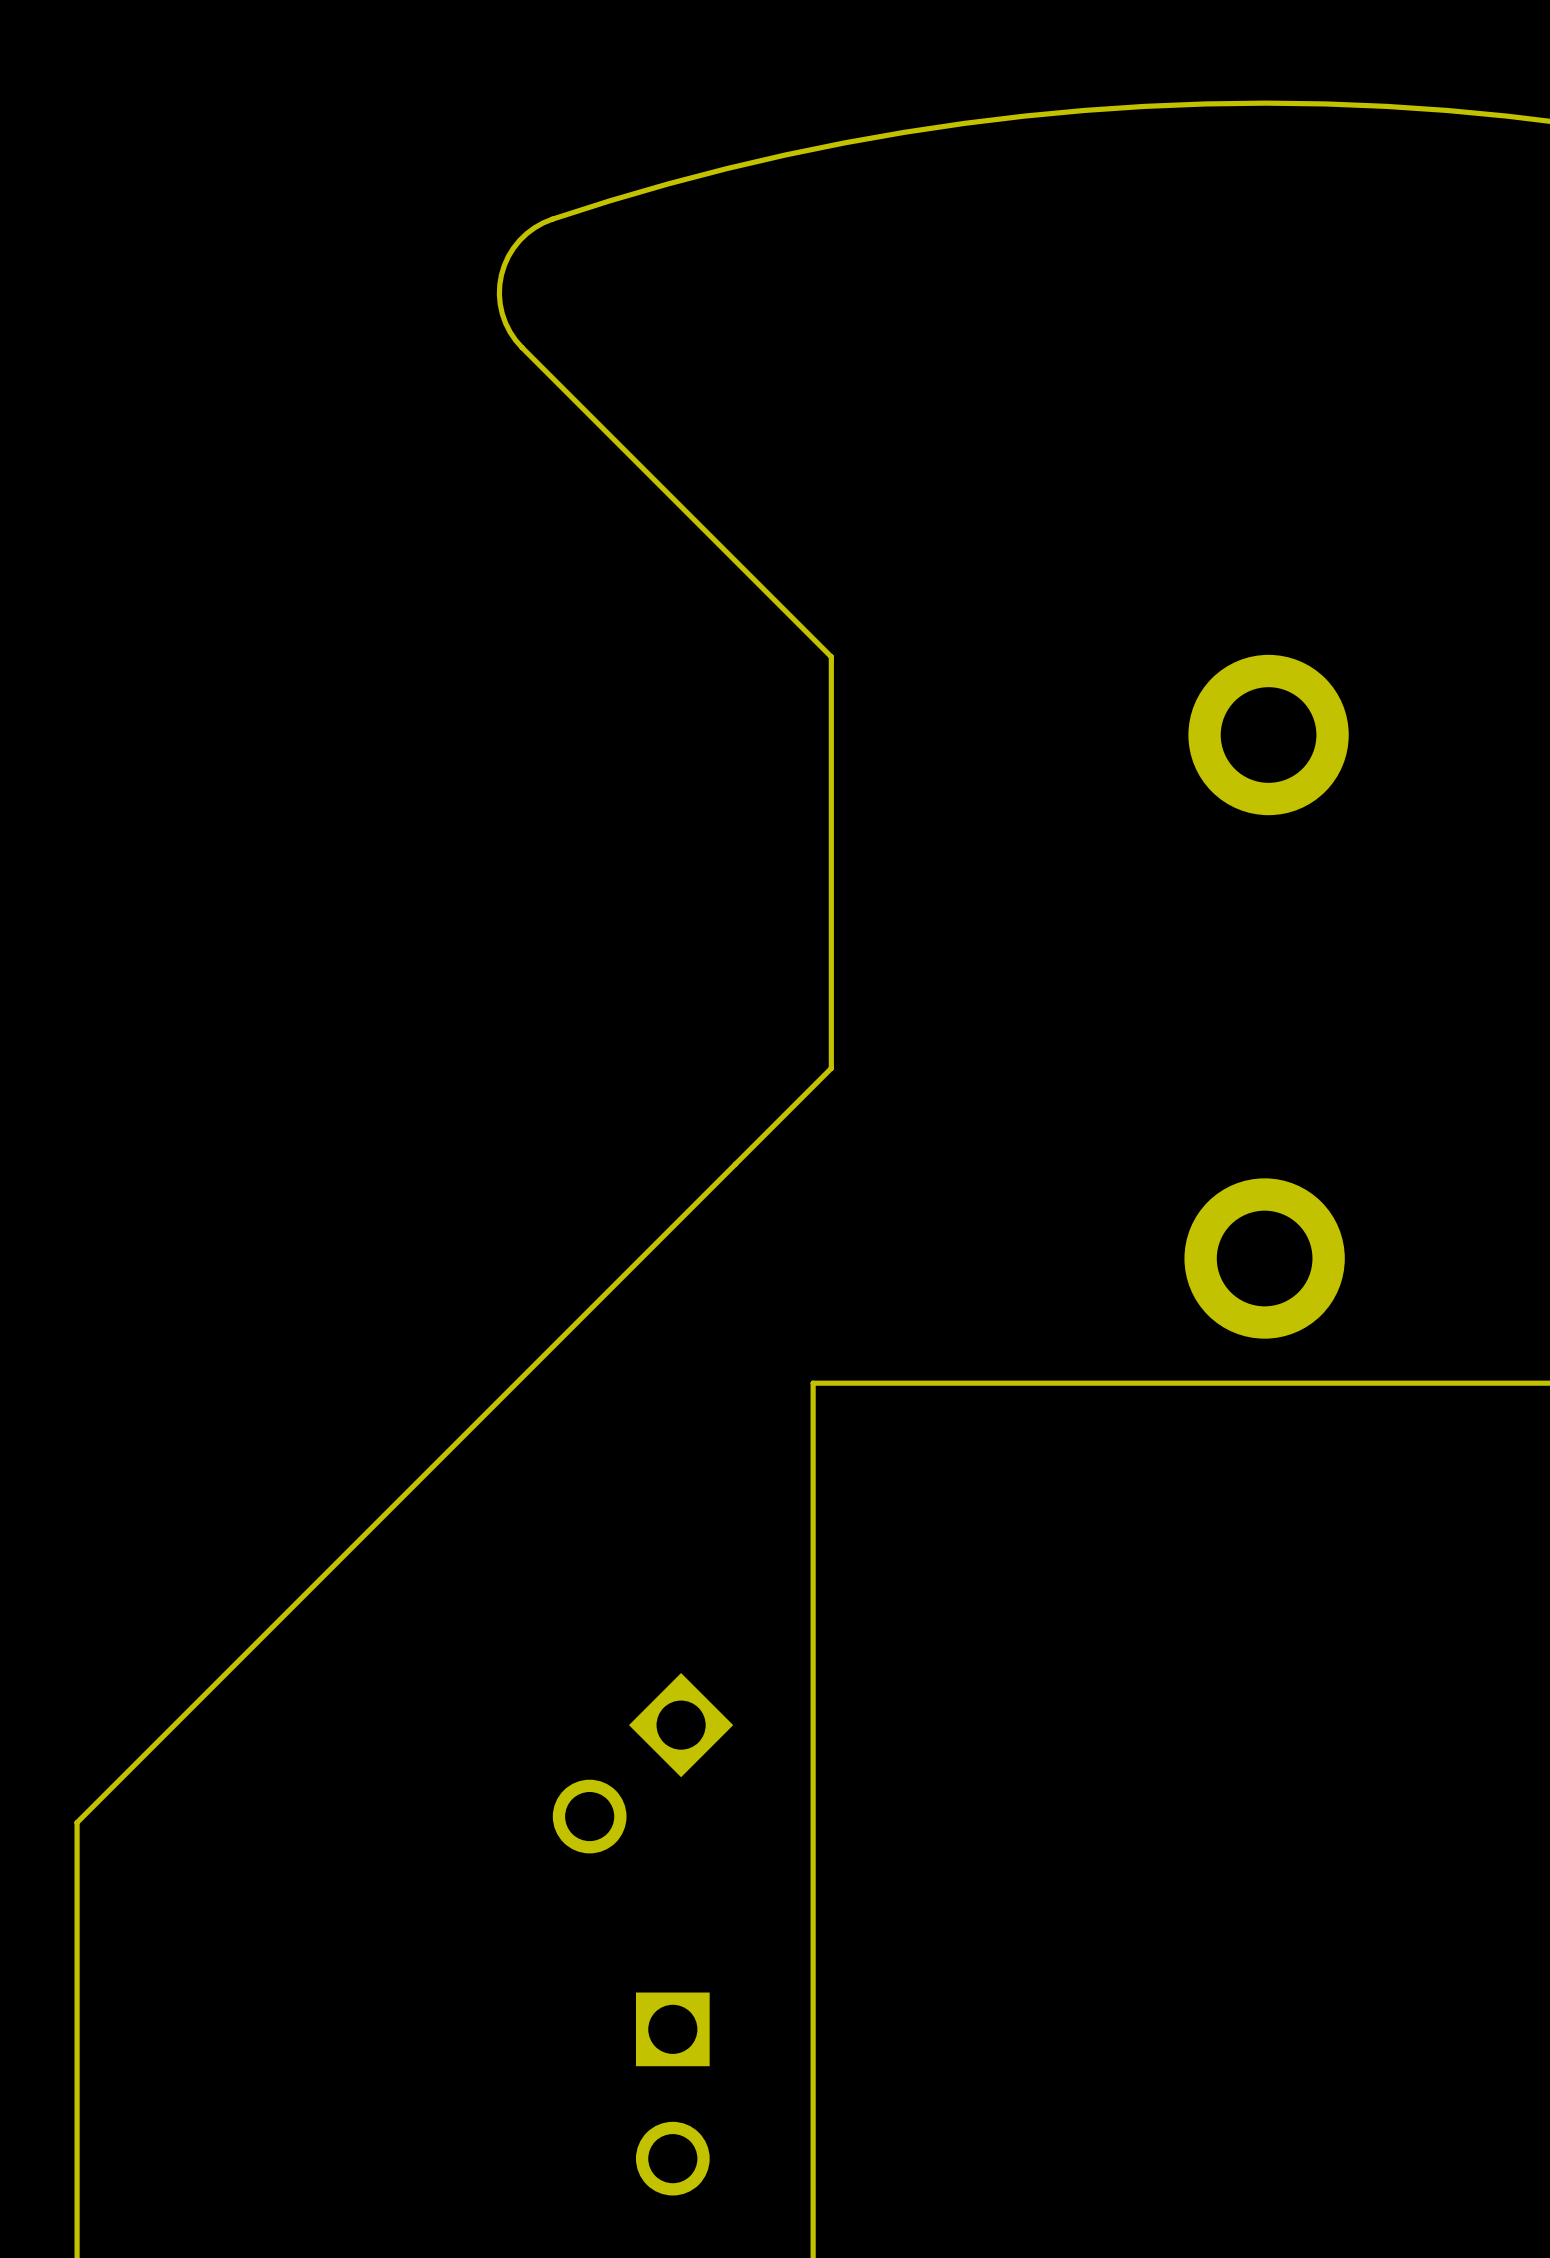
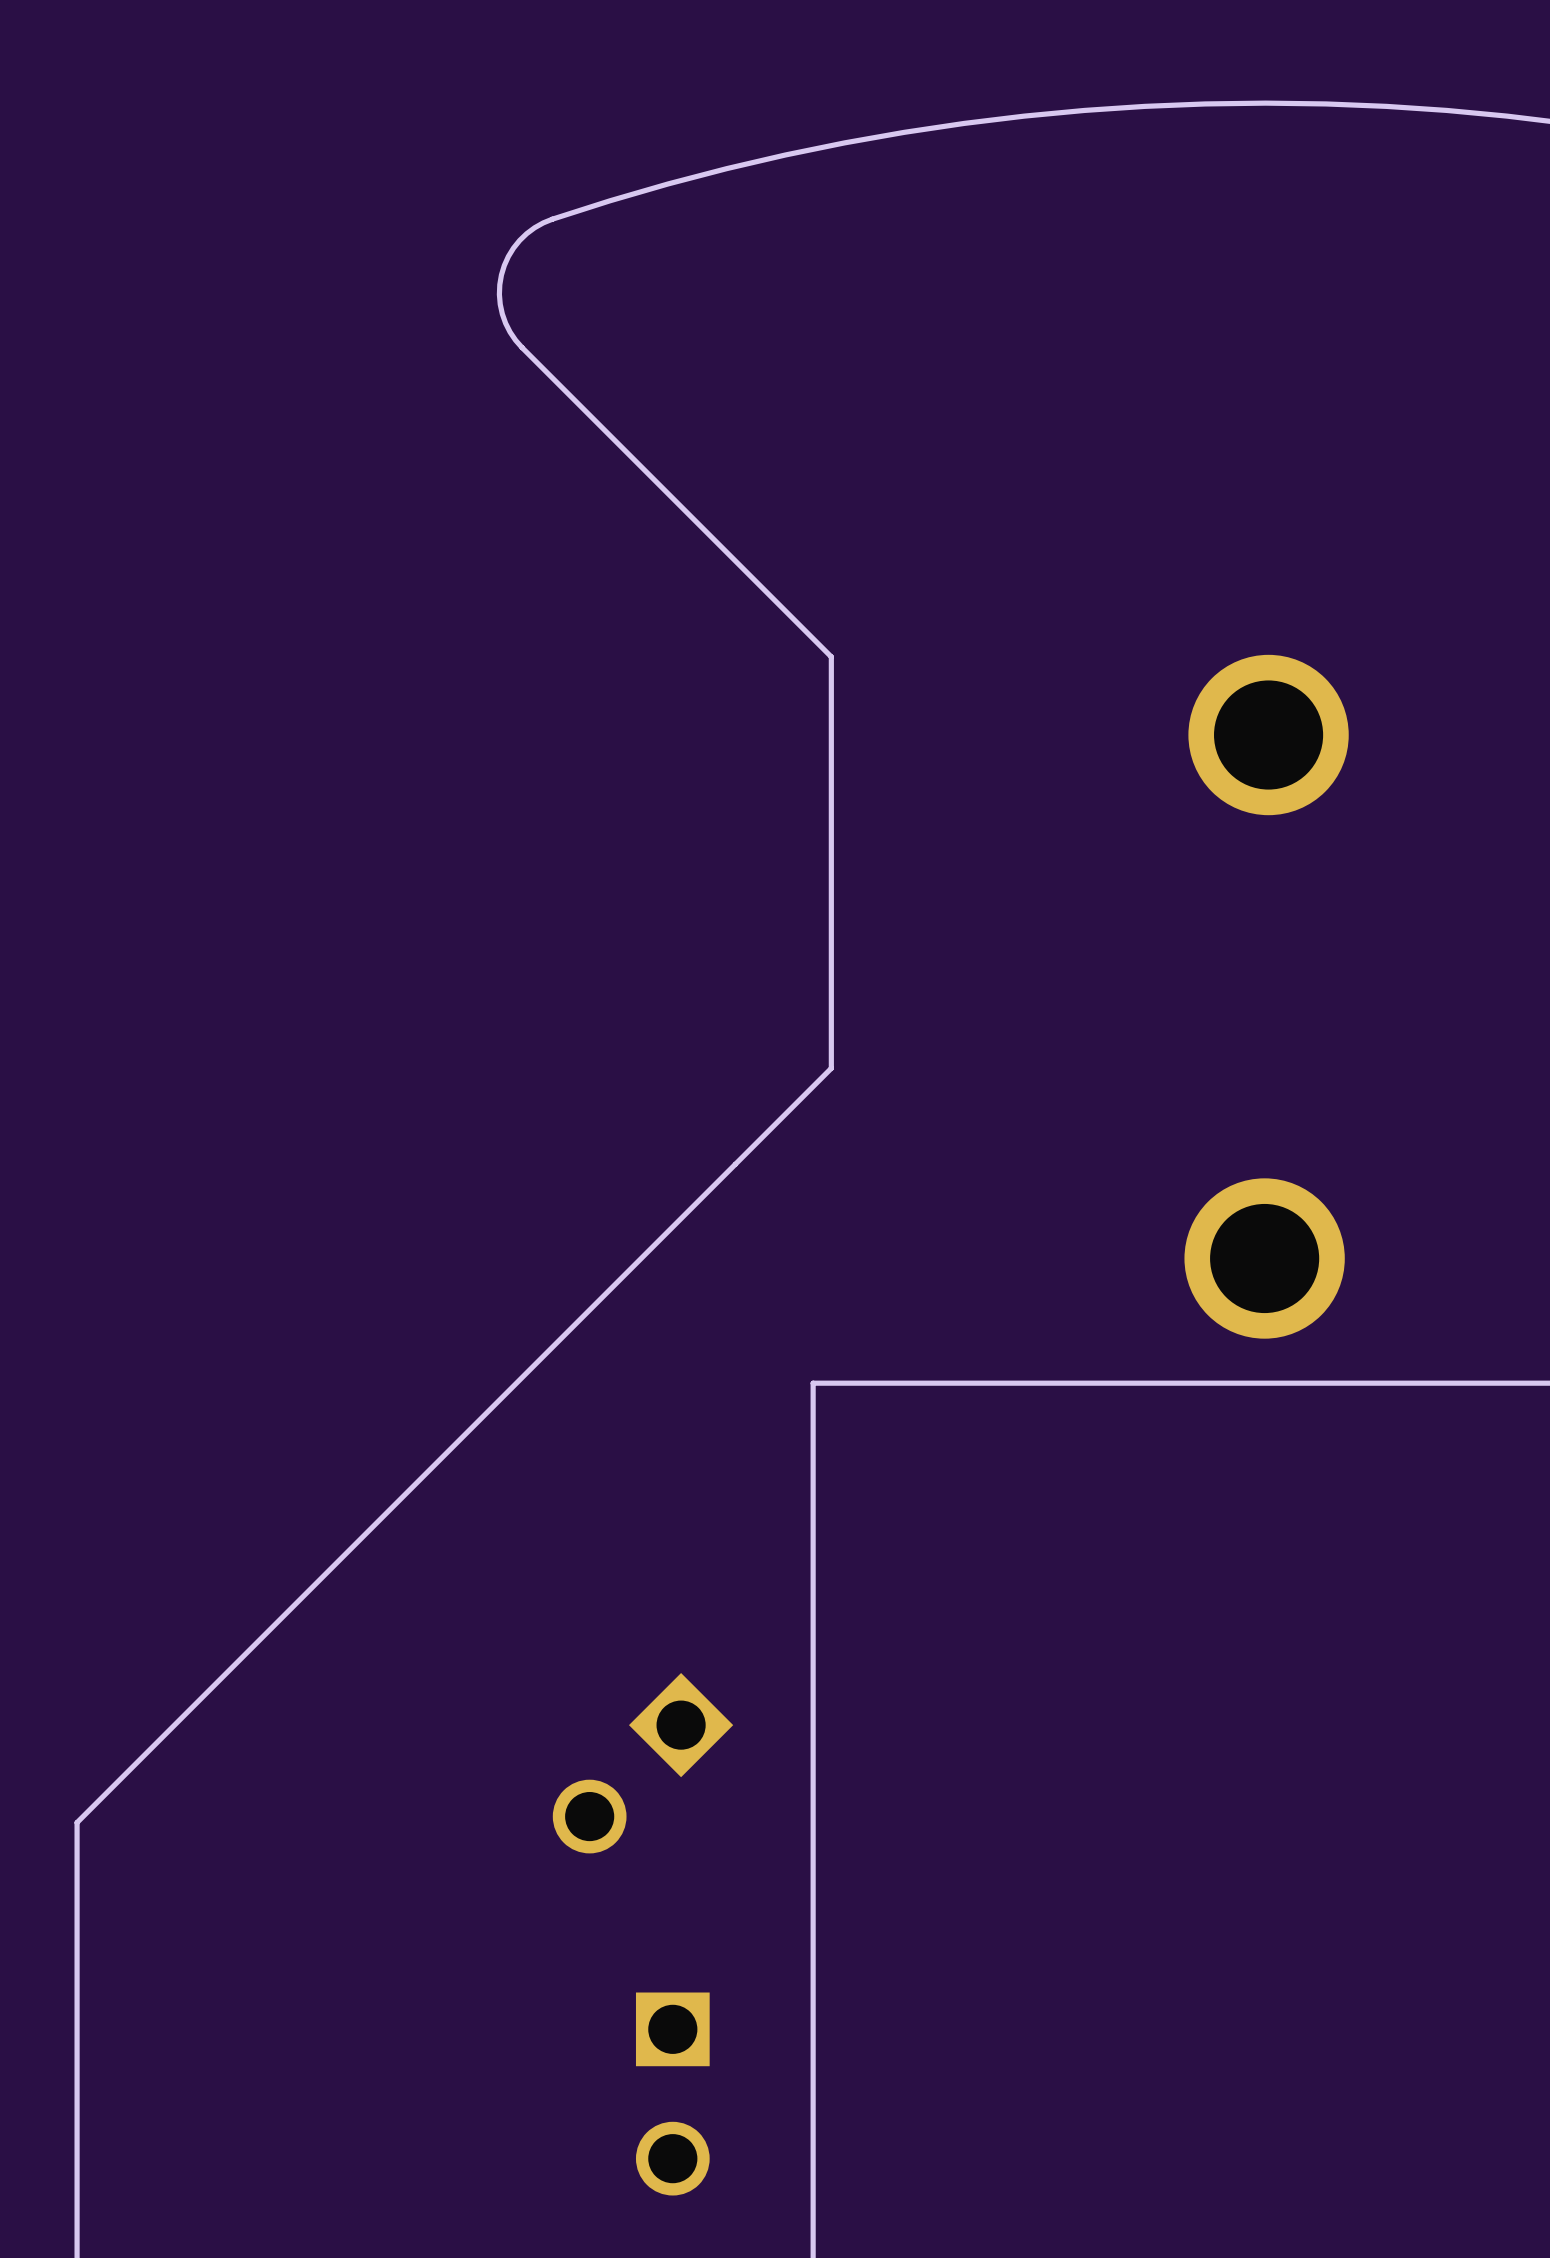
part footprint: [1188, 654, 1349, 816] -> [1188, 654, 1349, 816]
part footprint: [1184, 1178, 1345, 1339] -> [1184, 1178, 1345, 1339]

